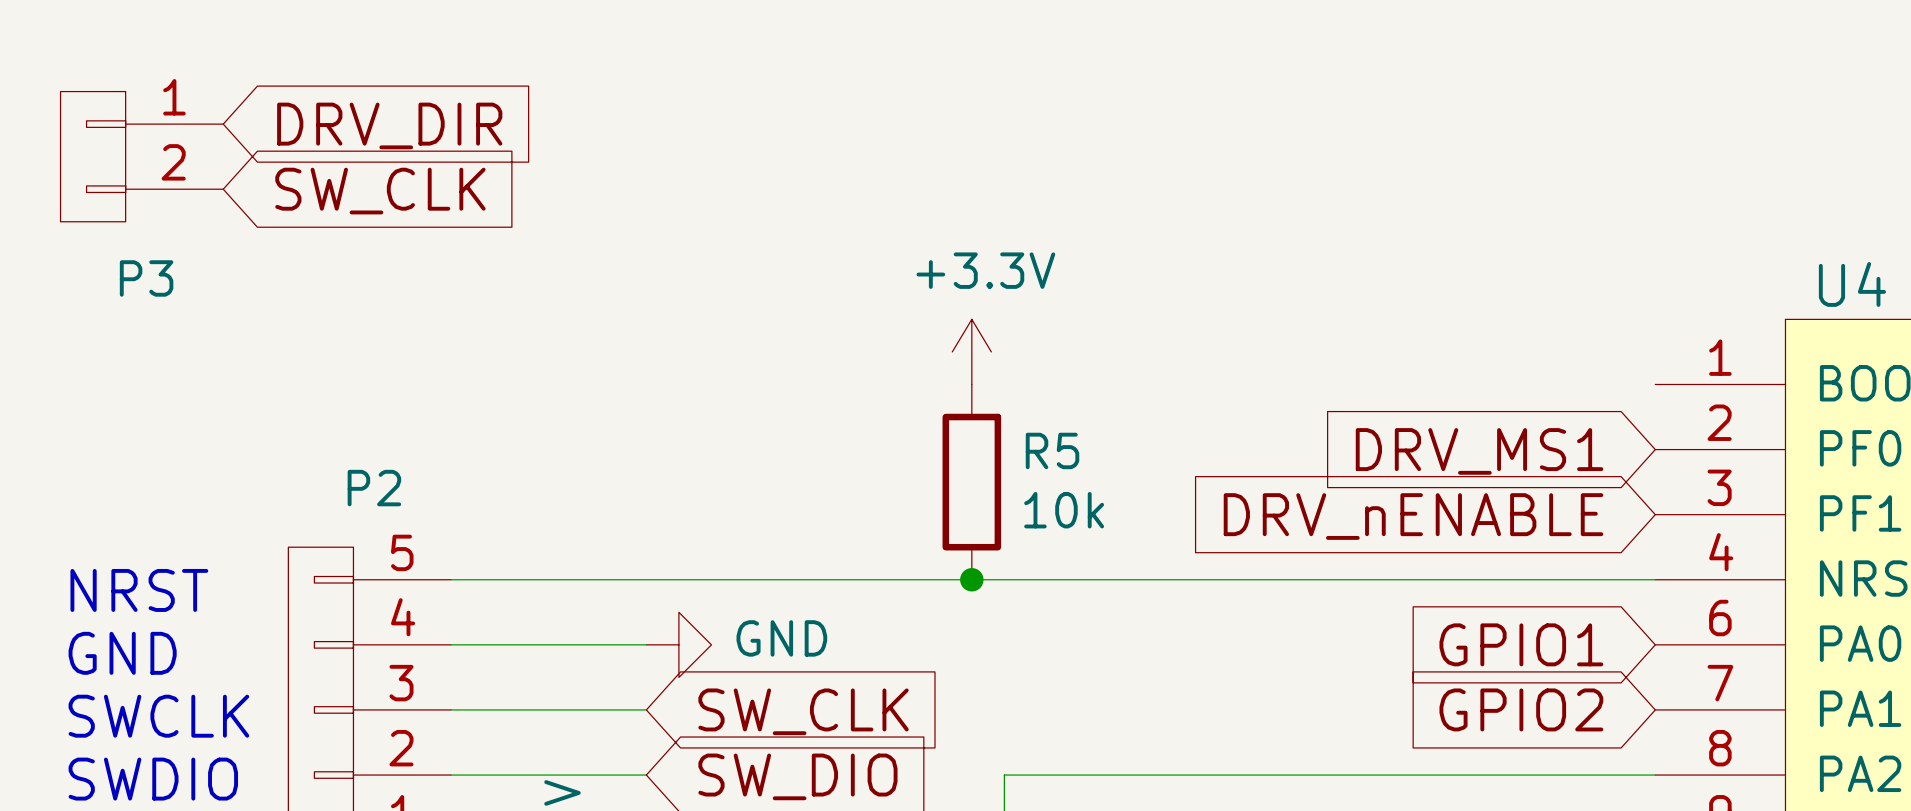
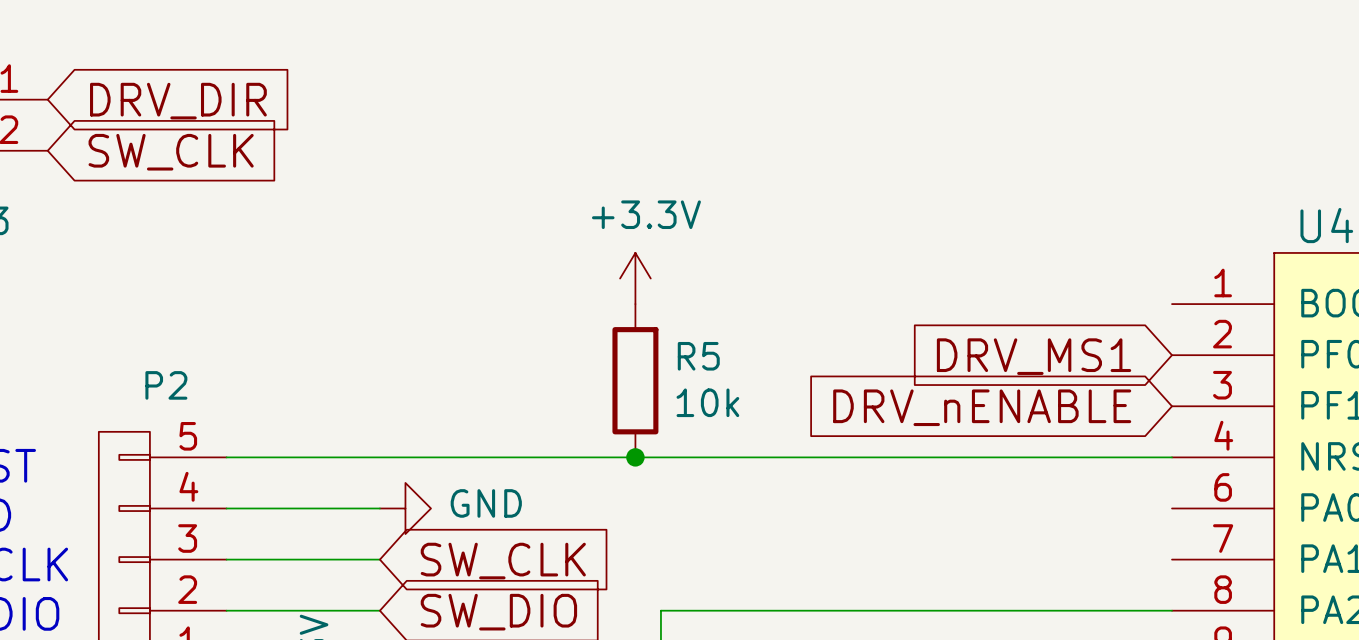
global label: GPIO1 (1521, 644) -> none
global label: GPIO2 (1521, 709) -> none

